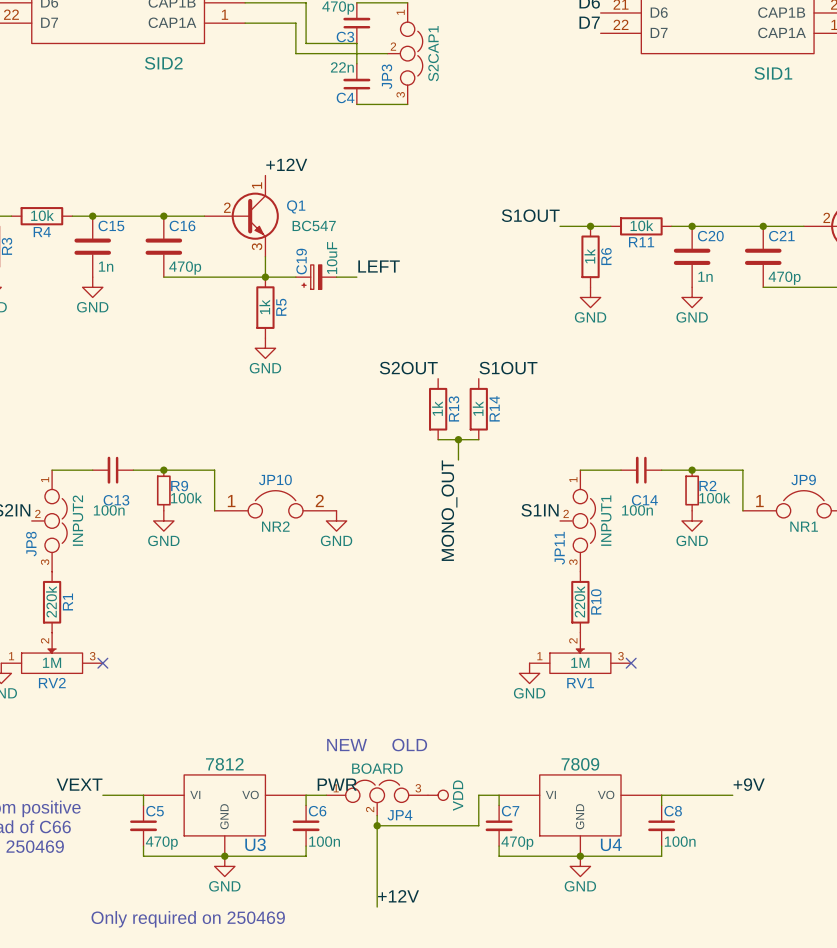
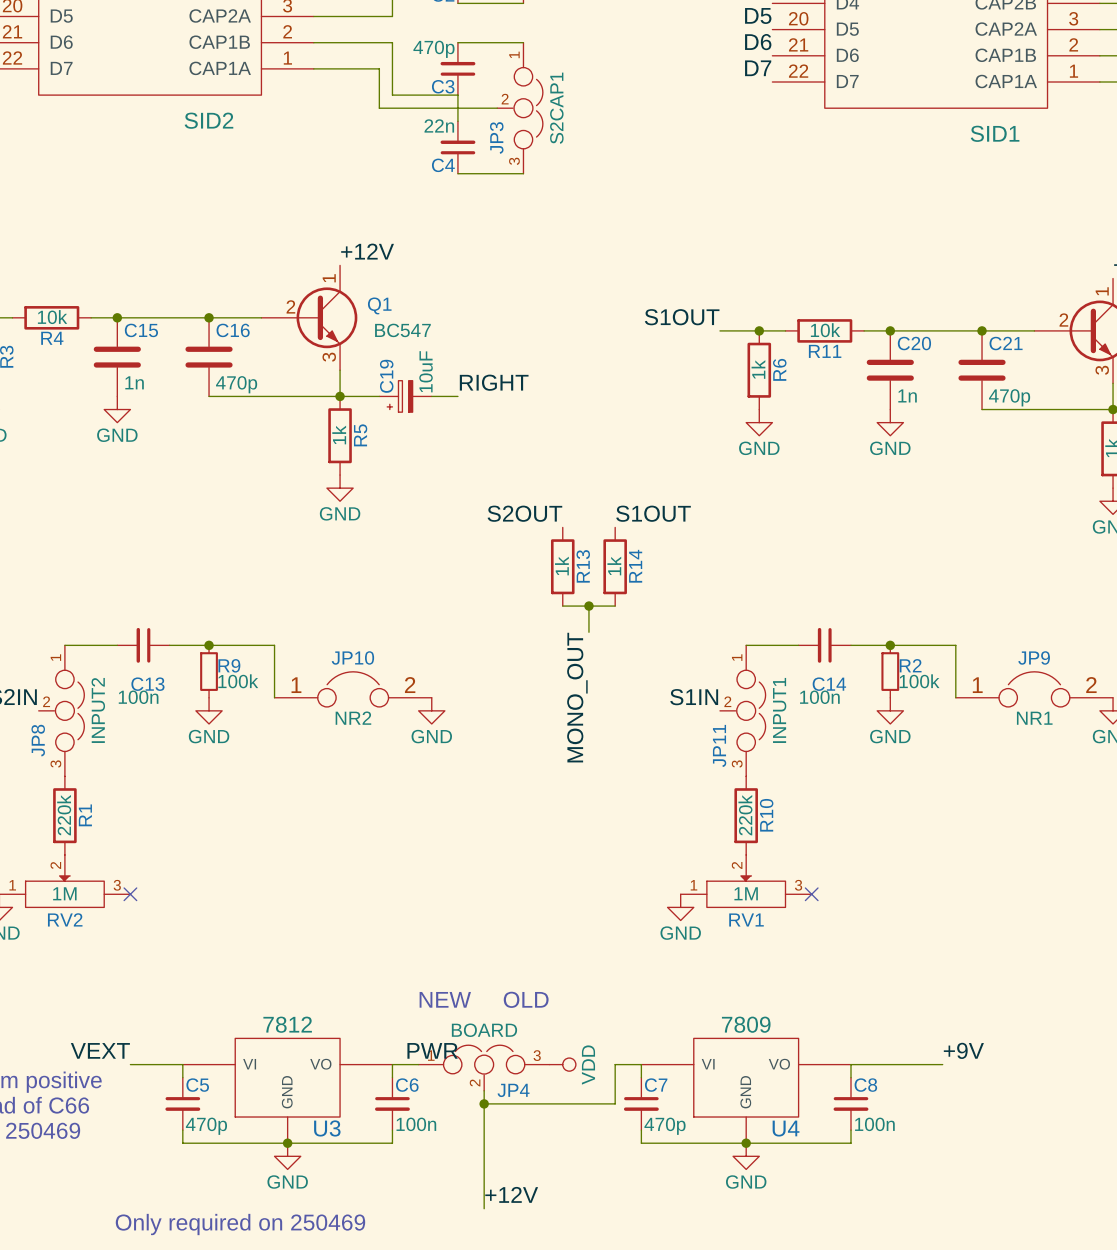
label: LEFT (379, 266) -> RIGHT (494, 382)

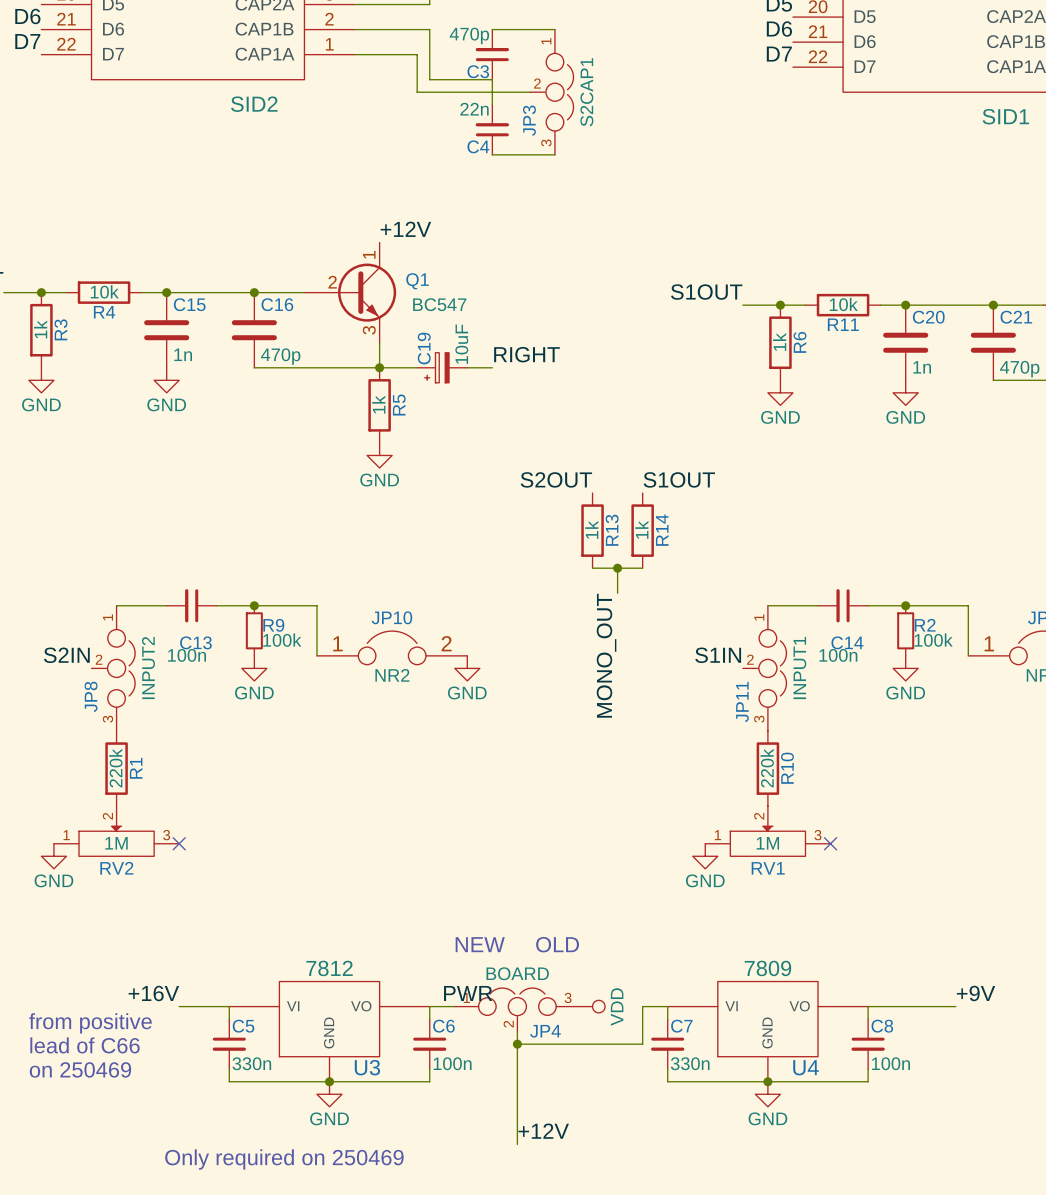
label: VEXT (100, 1050) -> +16V (153, 993)
C5 value: 470p (206, 1126) -> 330n (251, 1063)
C7 value: 470p (665, 1126) -> 330n (690, 1063)

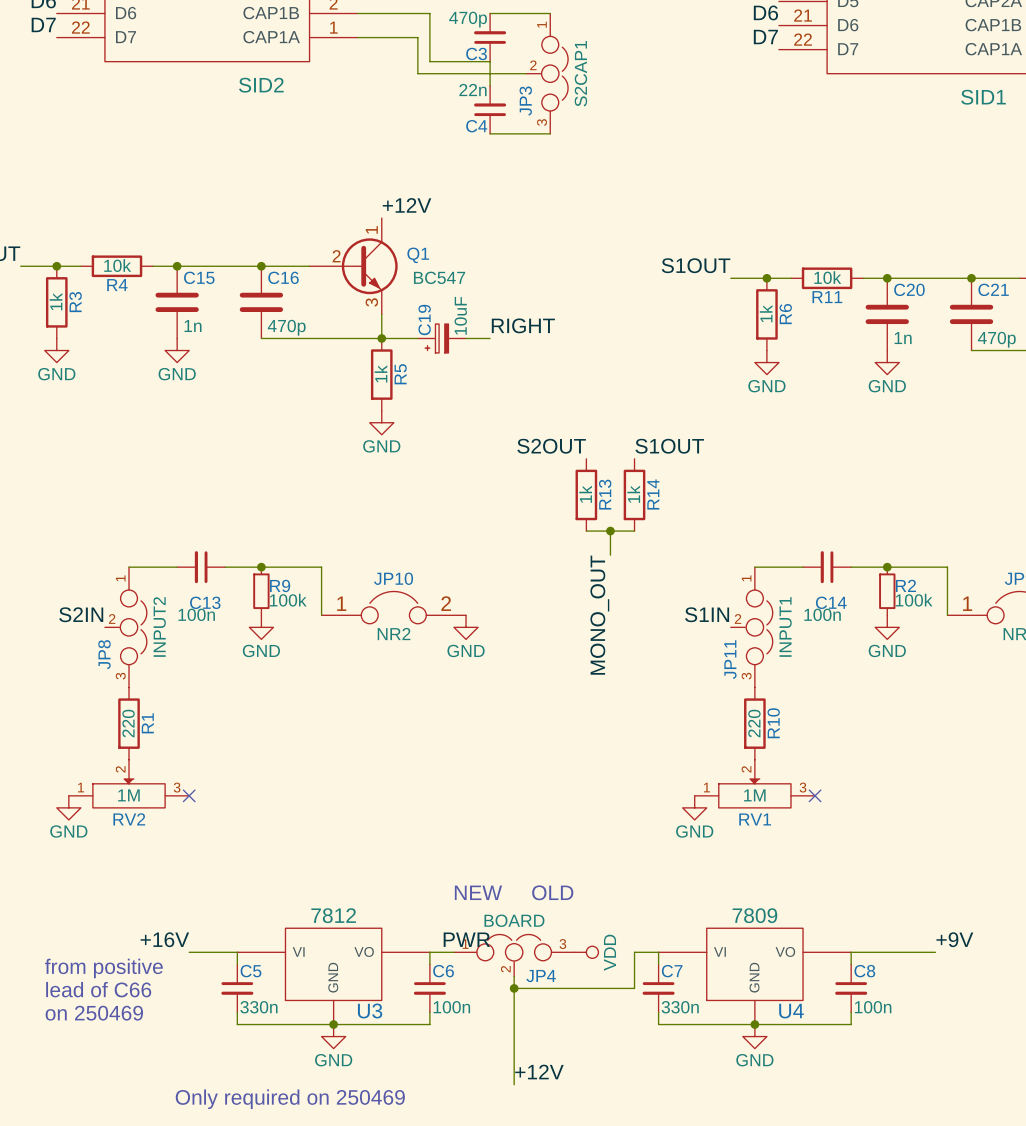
R1 value: 220k (115, 768) -> 220 (128, 723)
R10 value: 220k (767, 768) -> 220 (754, 723)

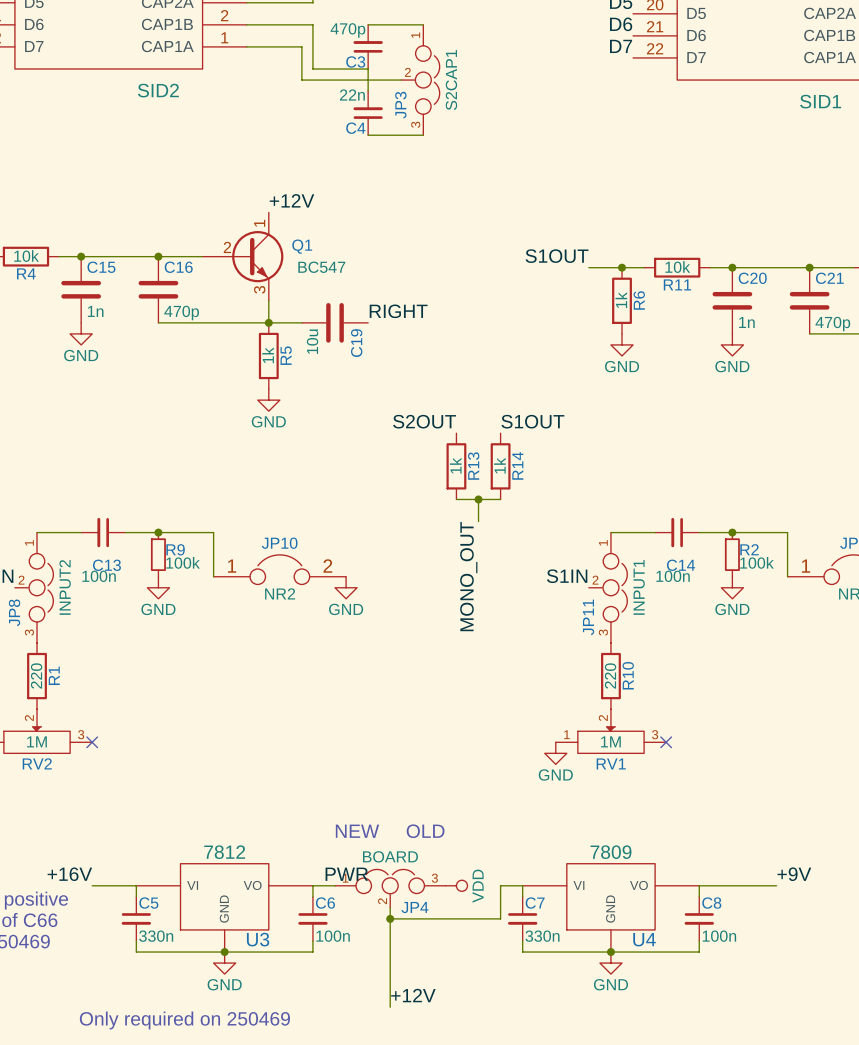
C19 value: 10uF (460, 315) -> 10u (312, 341)
C19 name position: C19 (424, 320) -> C19 (356, 343)
C19 symbol: [417, 324, 467, 353] -> [301, 303, 369, 343]

